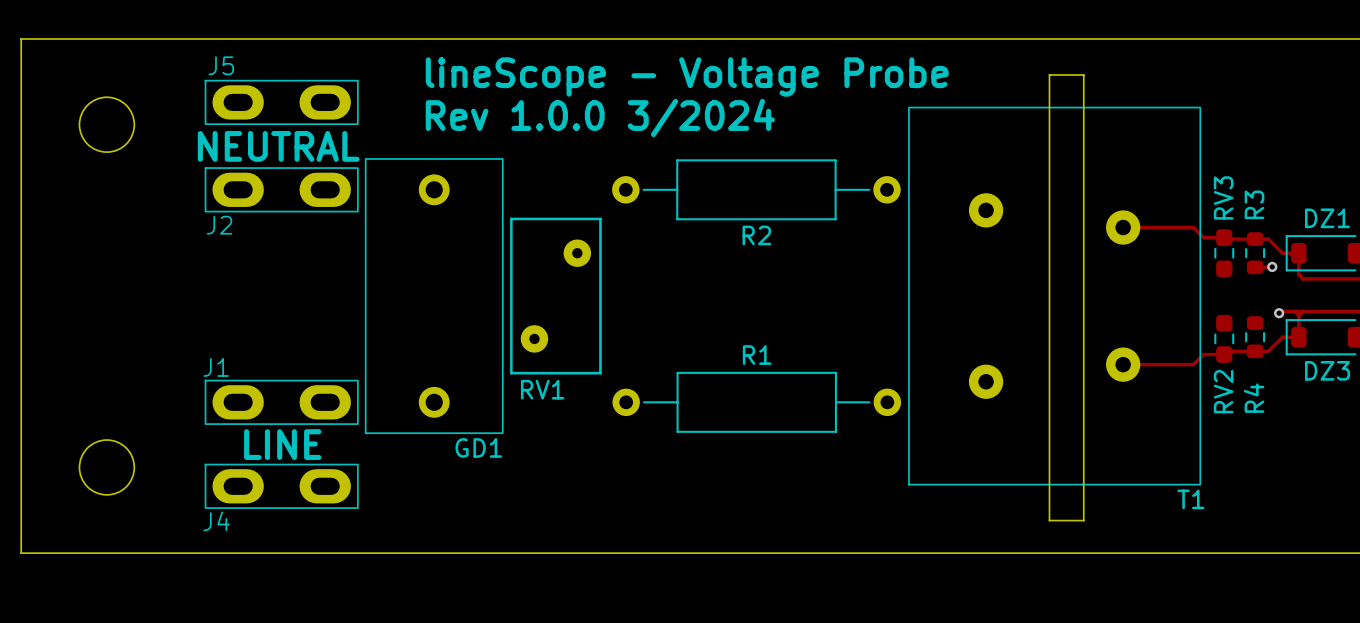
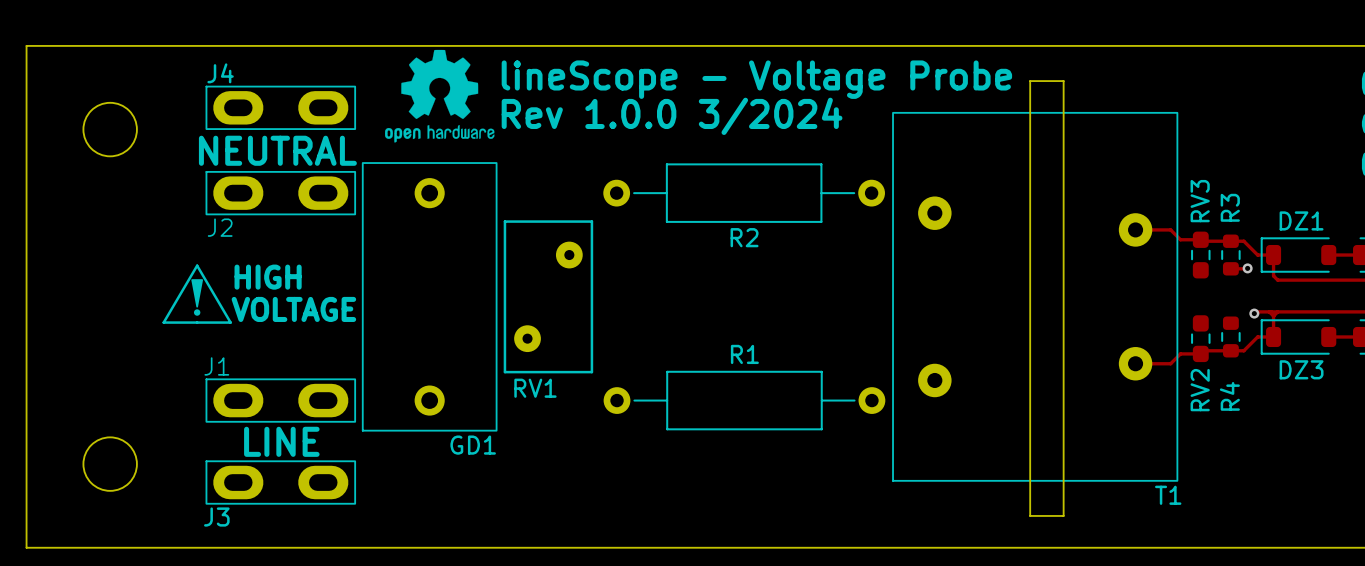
drawing: none -> [385, 49, 495, 143]
J5 name: J5 (221, 65) -> J4 (220, 73)
text position: lineScope - Voltage Probe (687, 76) -> lineScope - Voltage Probe (756, 79)
T1 footprint: [908, 106, 1202, 486] -> [892, 112, 1179, 482]
text position: Rev 1.0.0 3/2024 (600, 117) -> Rev 1.0.0 3/2024 (672, 116)
track: (1123, 227) (1157, 227) -> none
drawing: none -> [162, 264, 232, 324]
text: none -> HIGH (268, 277)
text: none -> VOLTAGE (293, 309)
track: (1123, 364) (1157, 364) -> none
J4 name: J4 (216, 521) -> J3 (216, 517)

